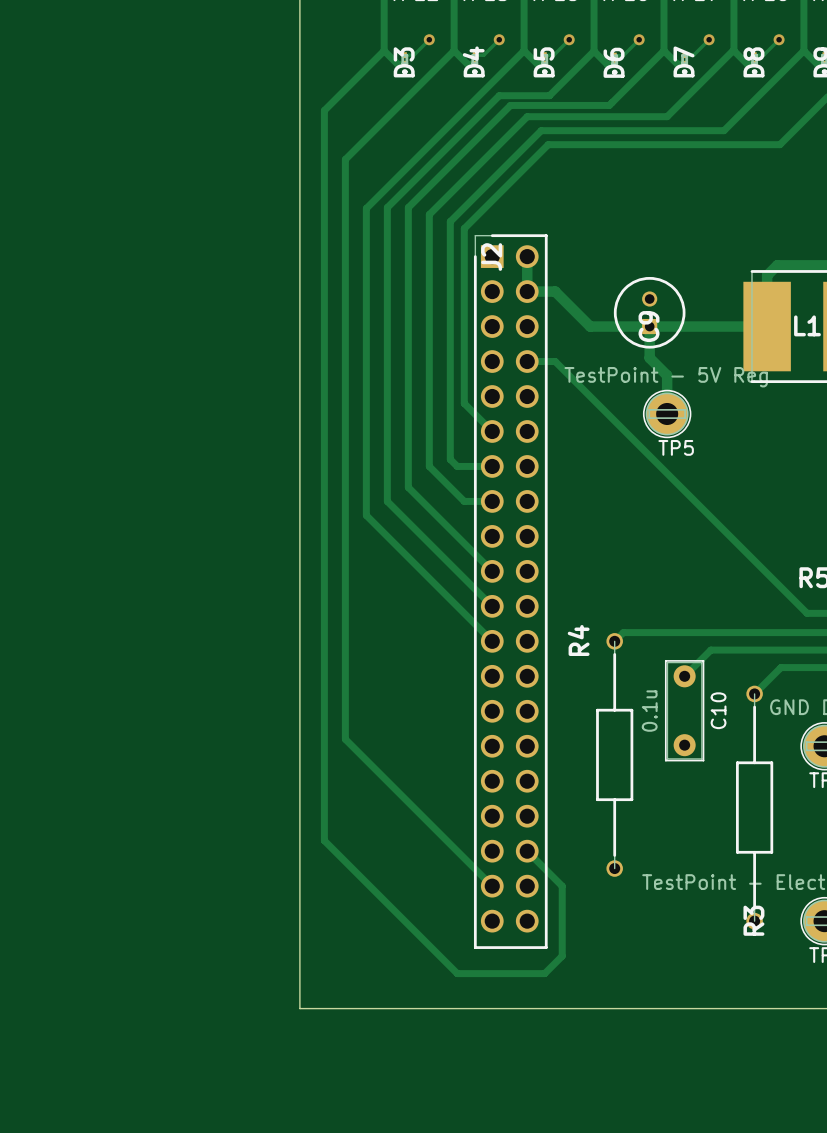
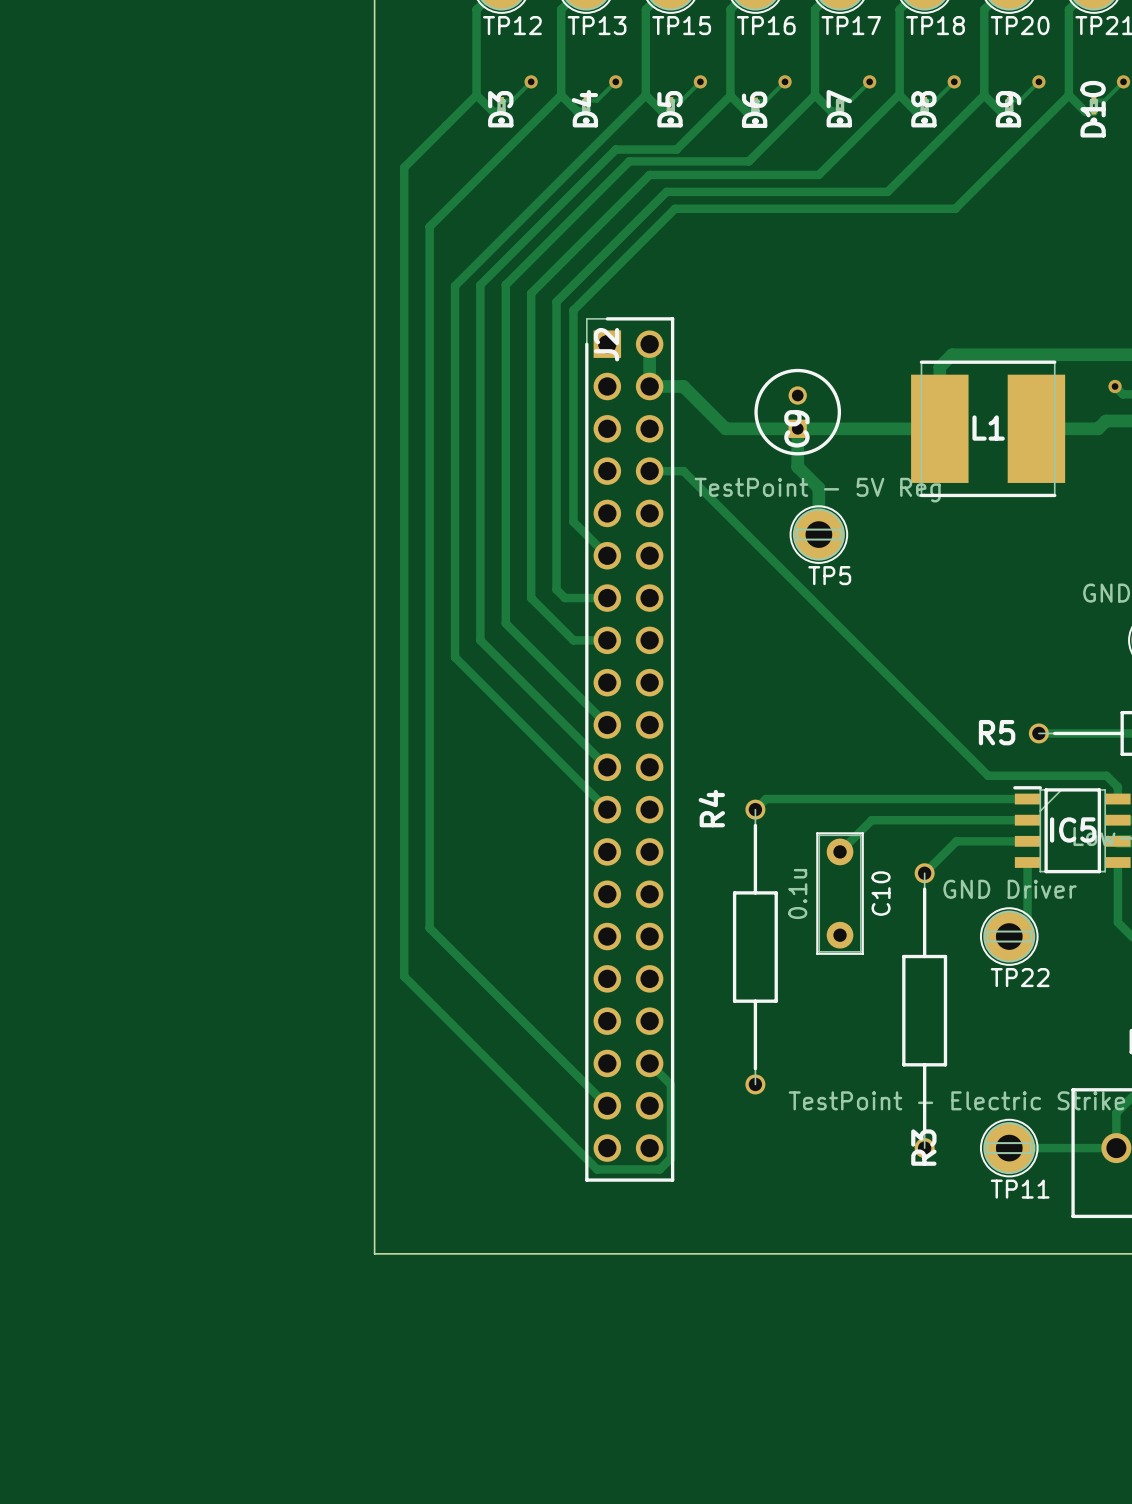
track: (324, 779) (324, 840) (457, 973) (544, 973) (562, 956) (562, 886) (544, 868) -> (404, 976) (597, 1169) (659, 1169) (670, 1158) (670, 1084)

